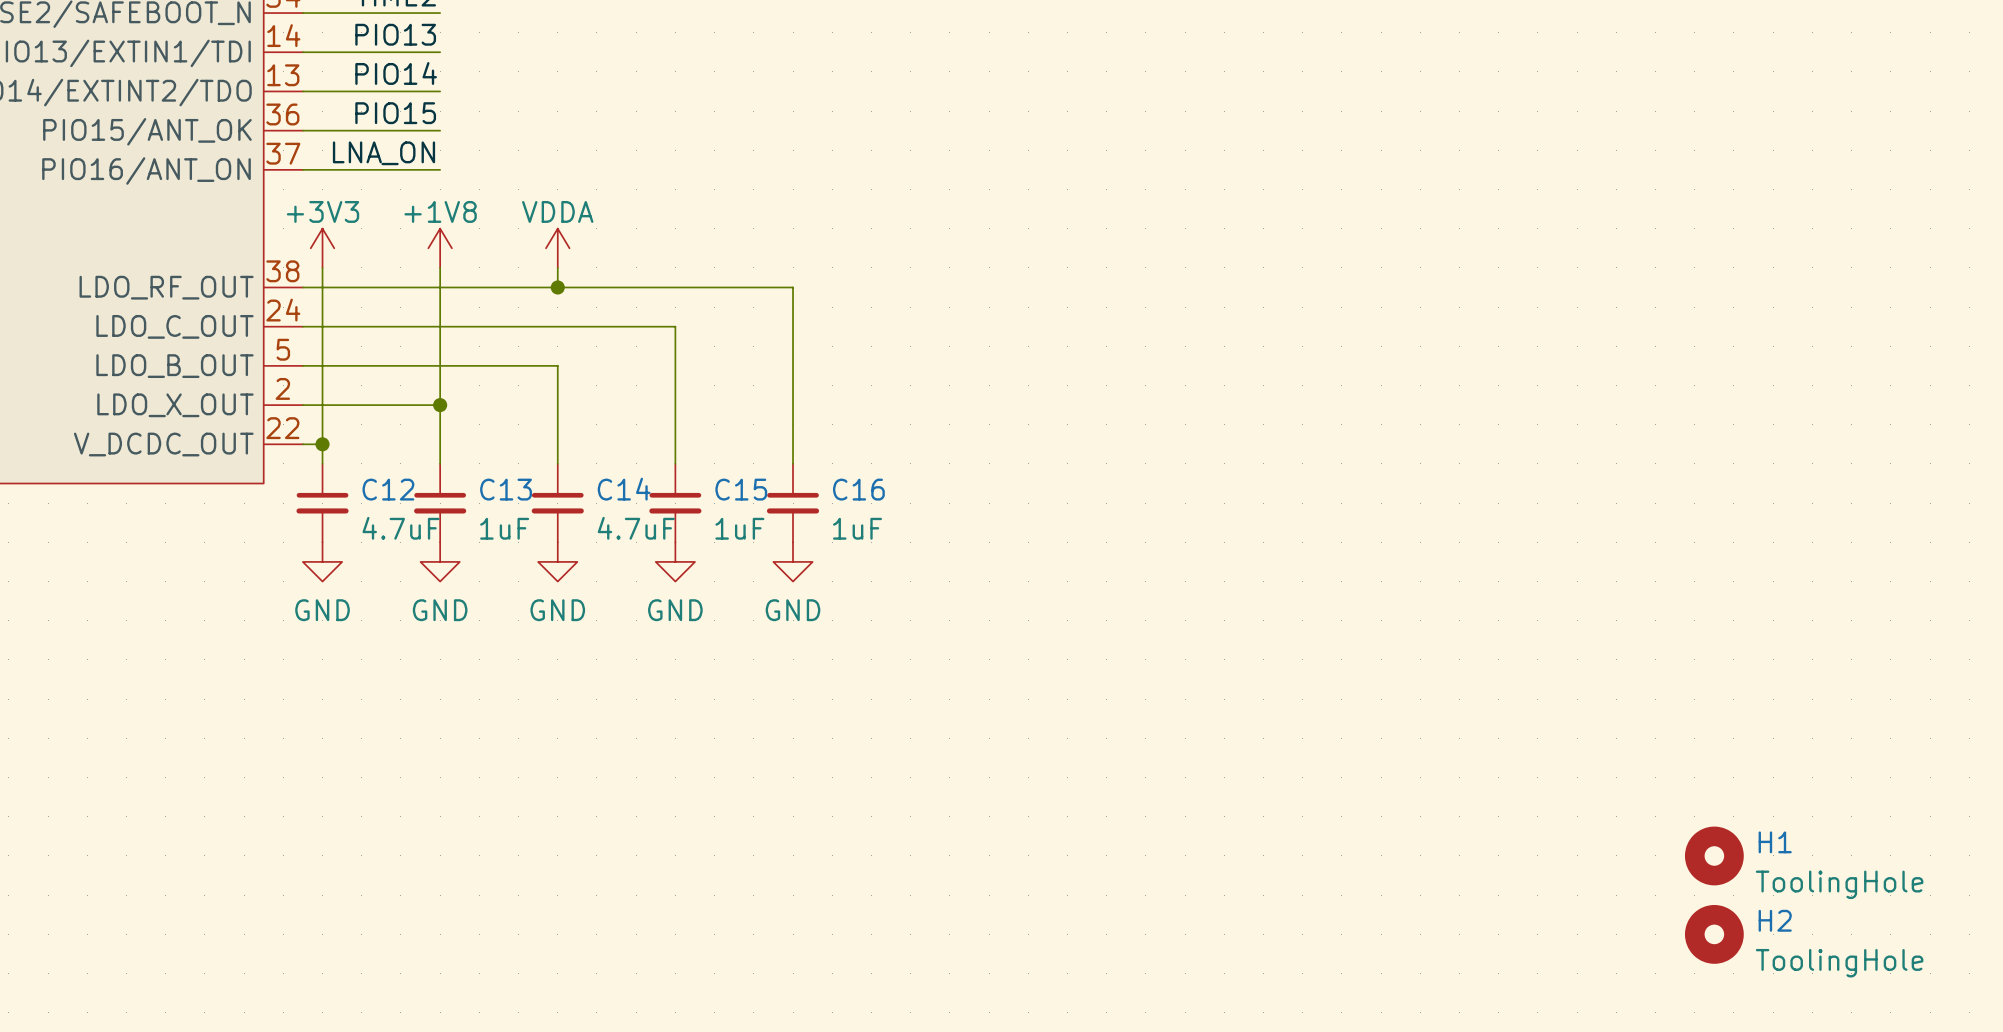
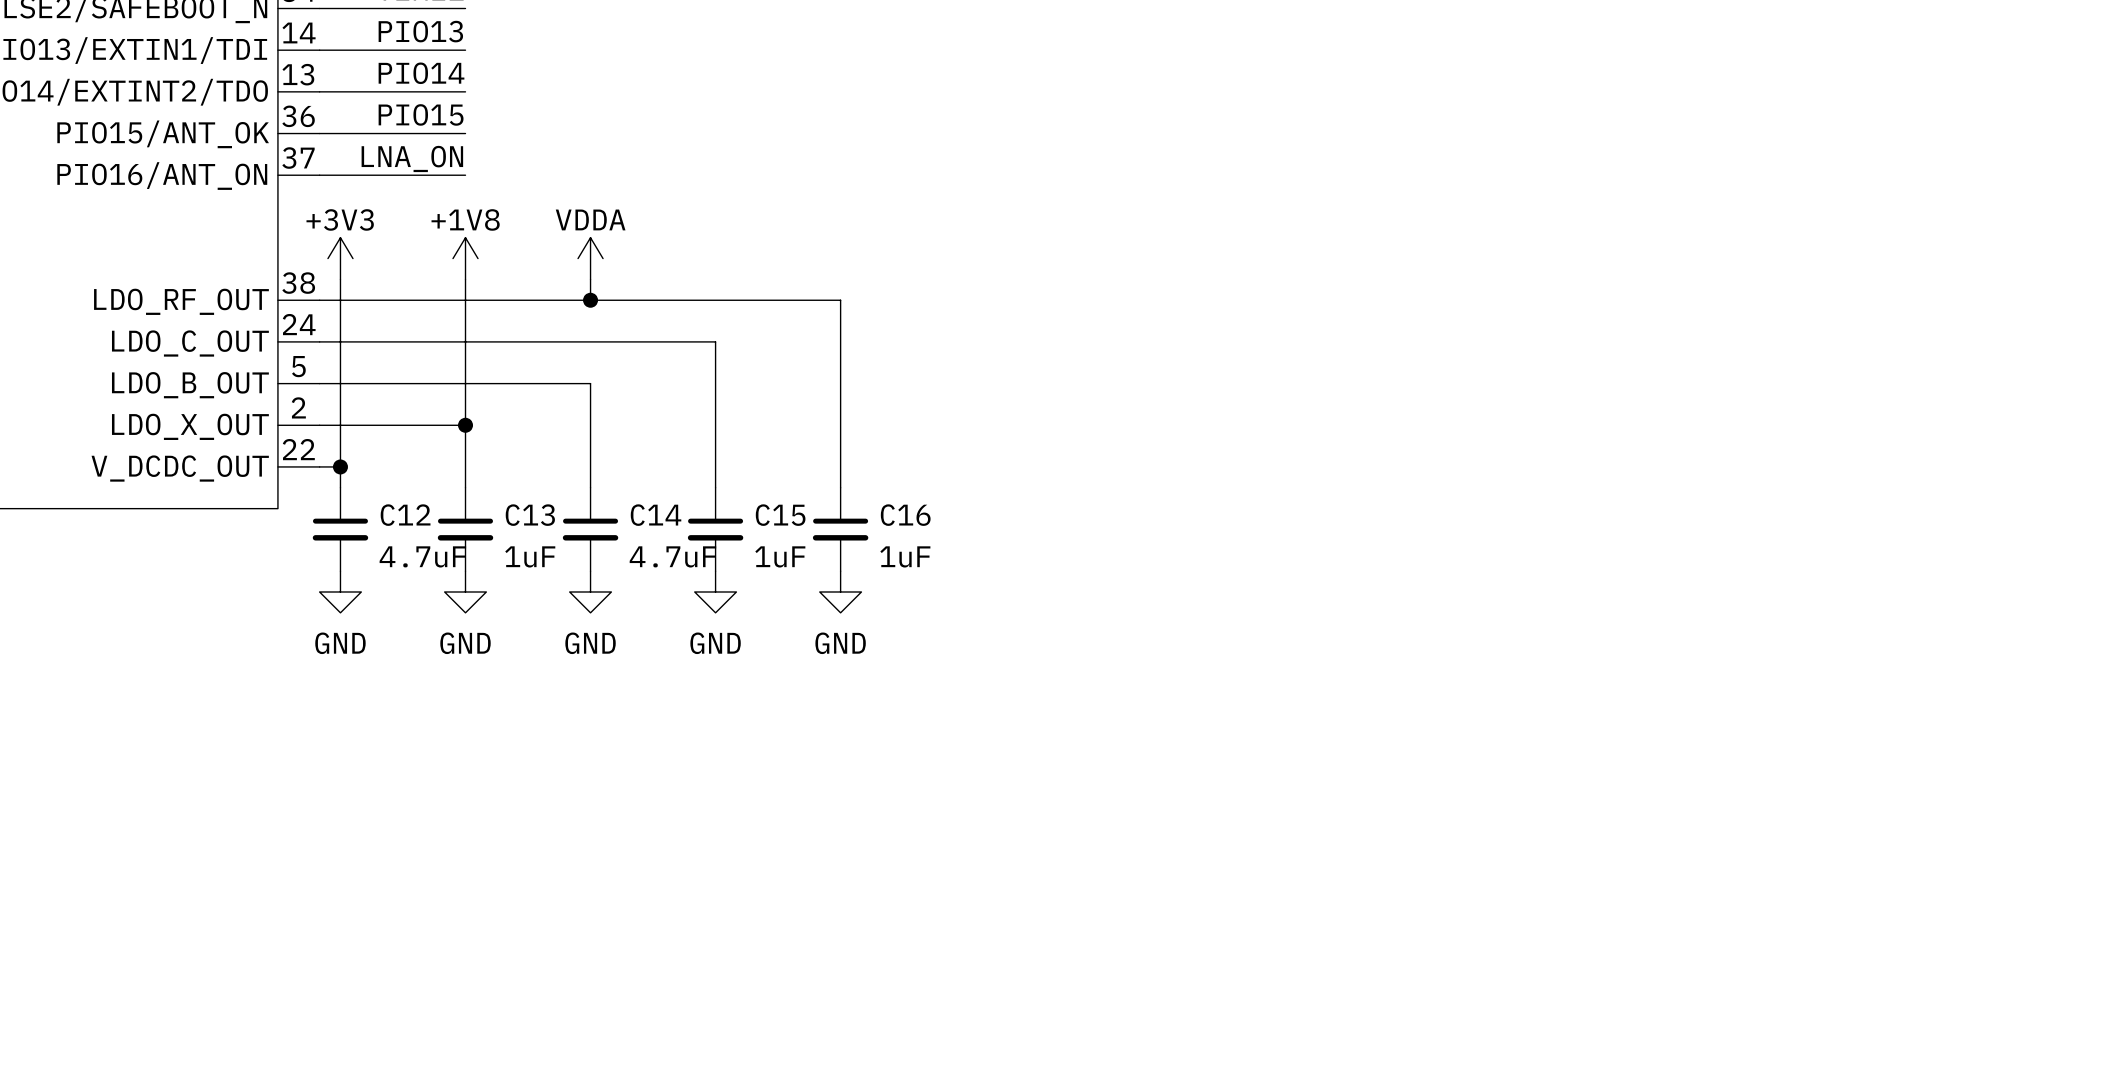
H1: ToolingHole (1714, 855) -> none
H2: ToolingHole (1714, 934) -> none

